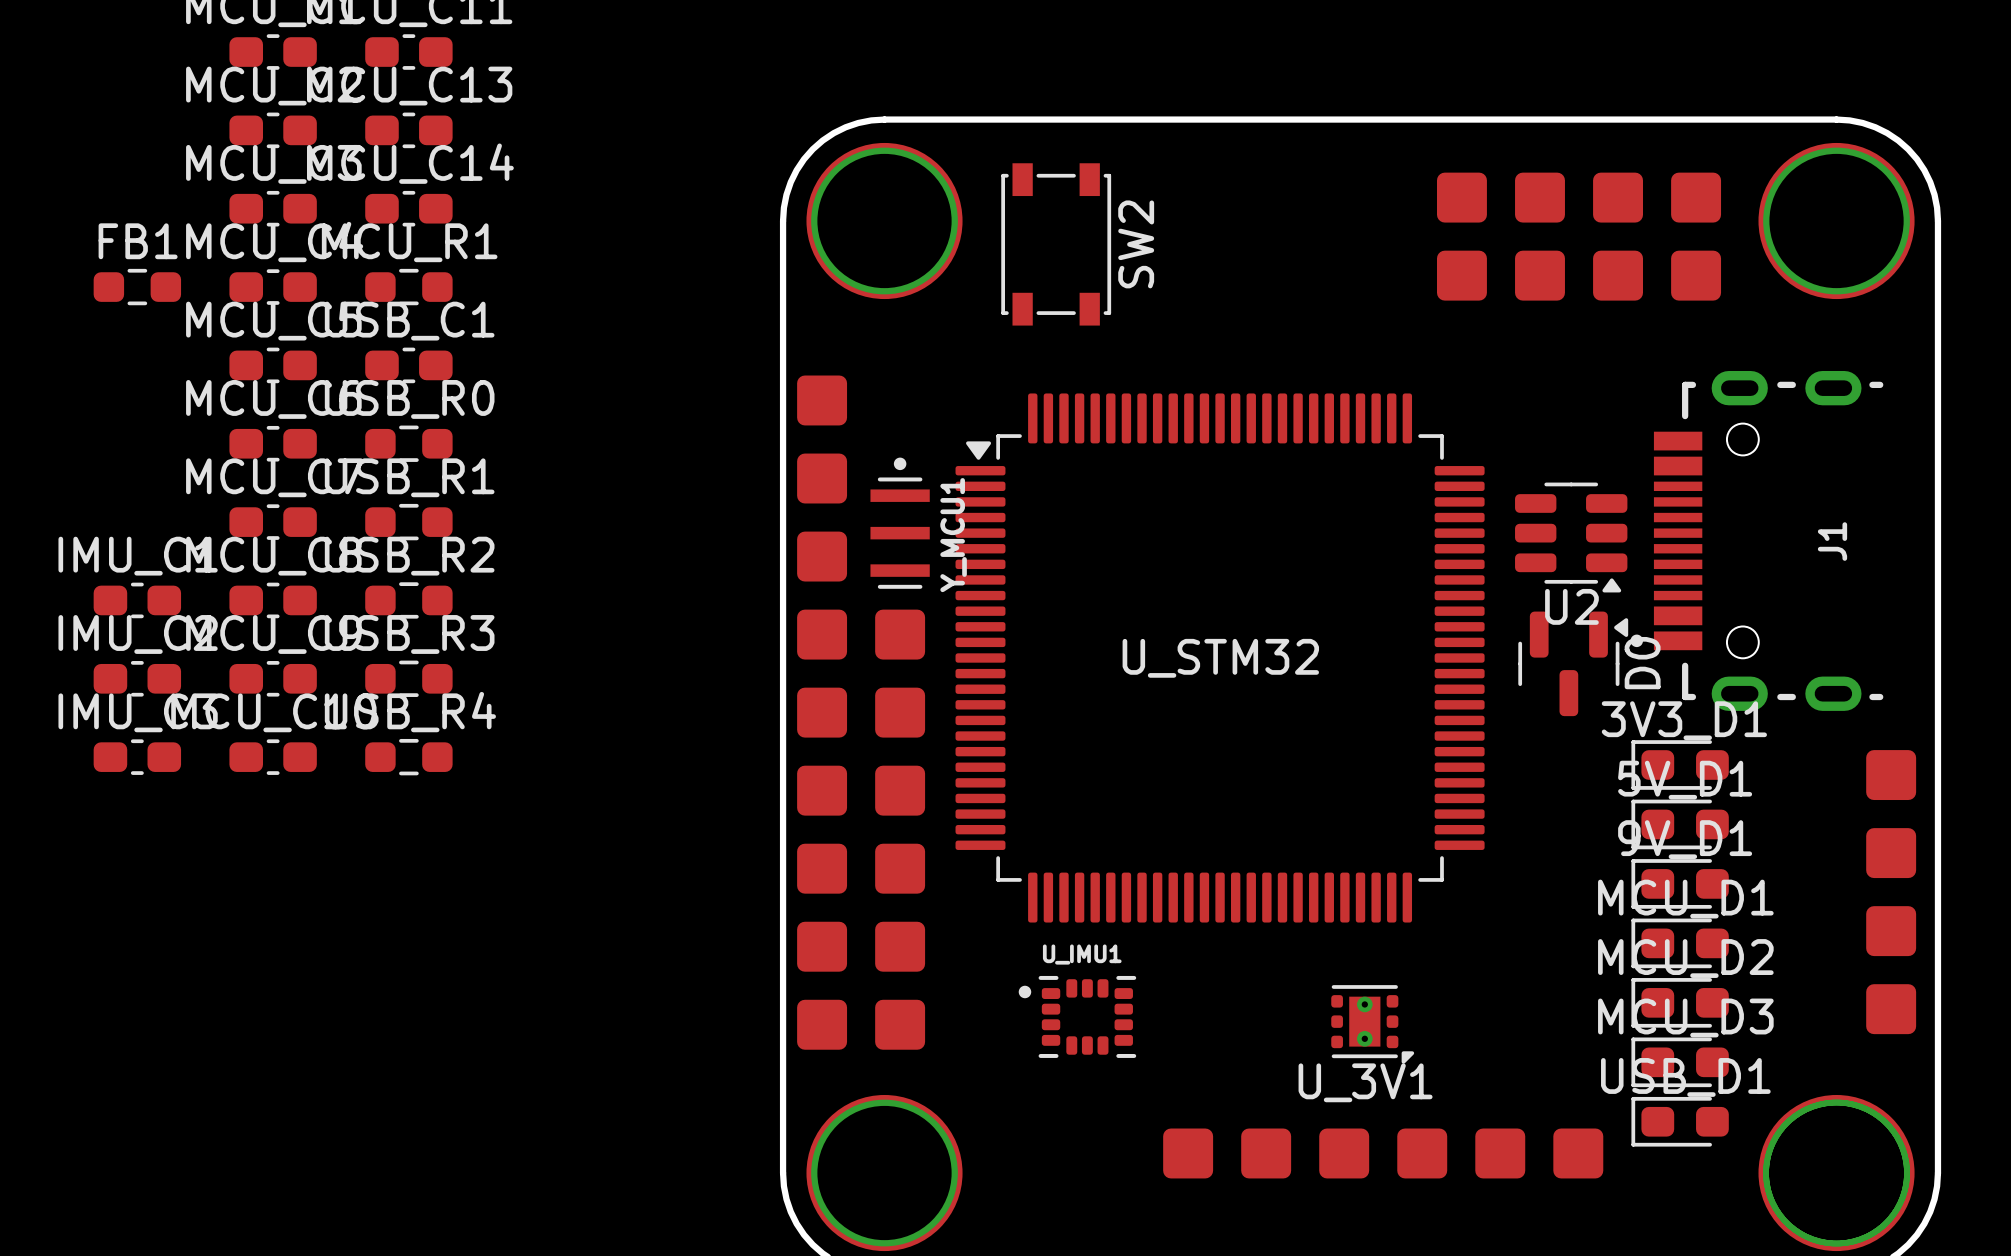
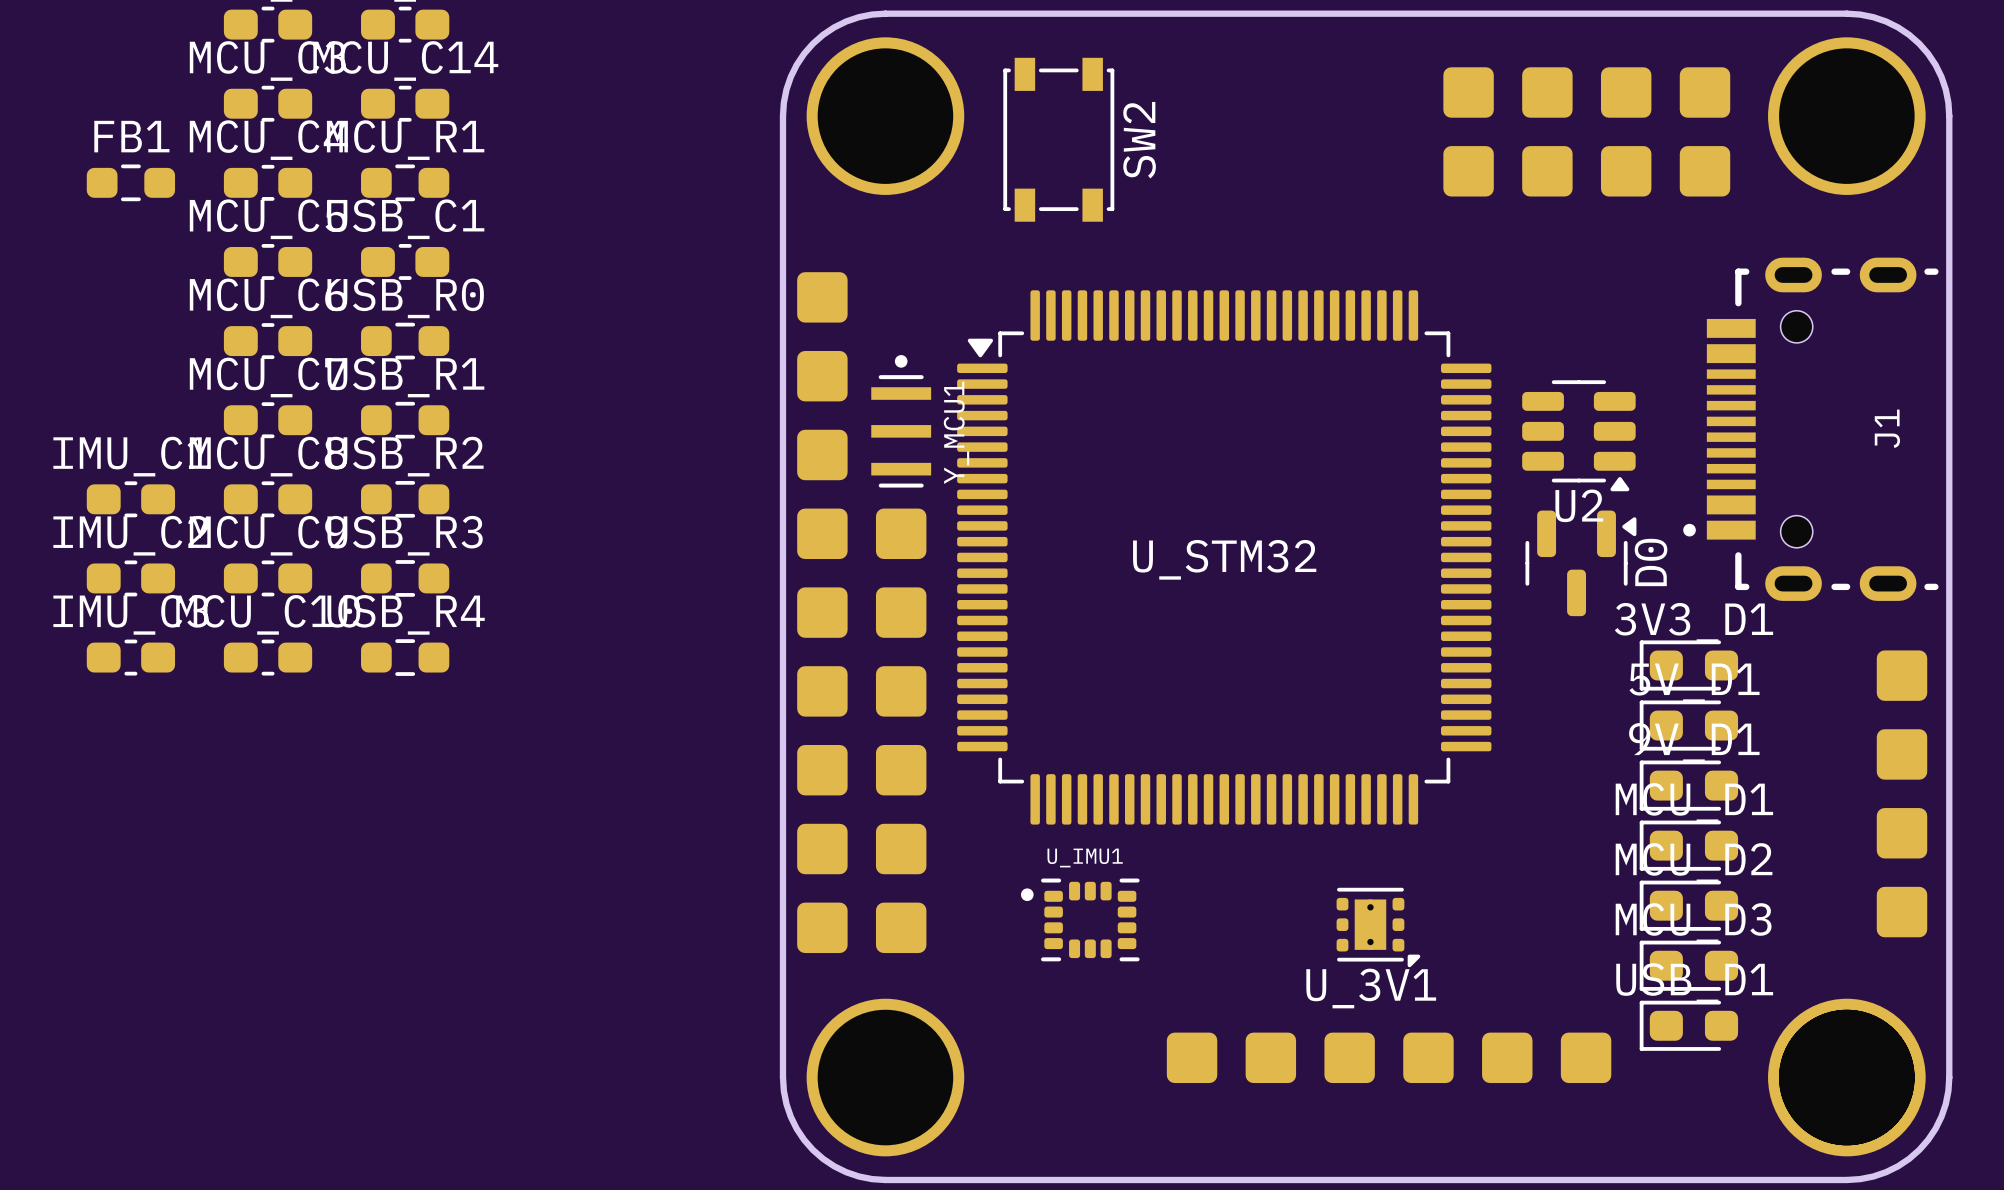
J1 position: (1756, 540) -> (1810, 429)

